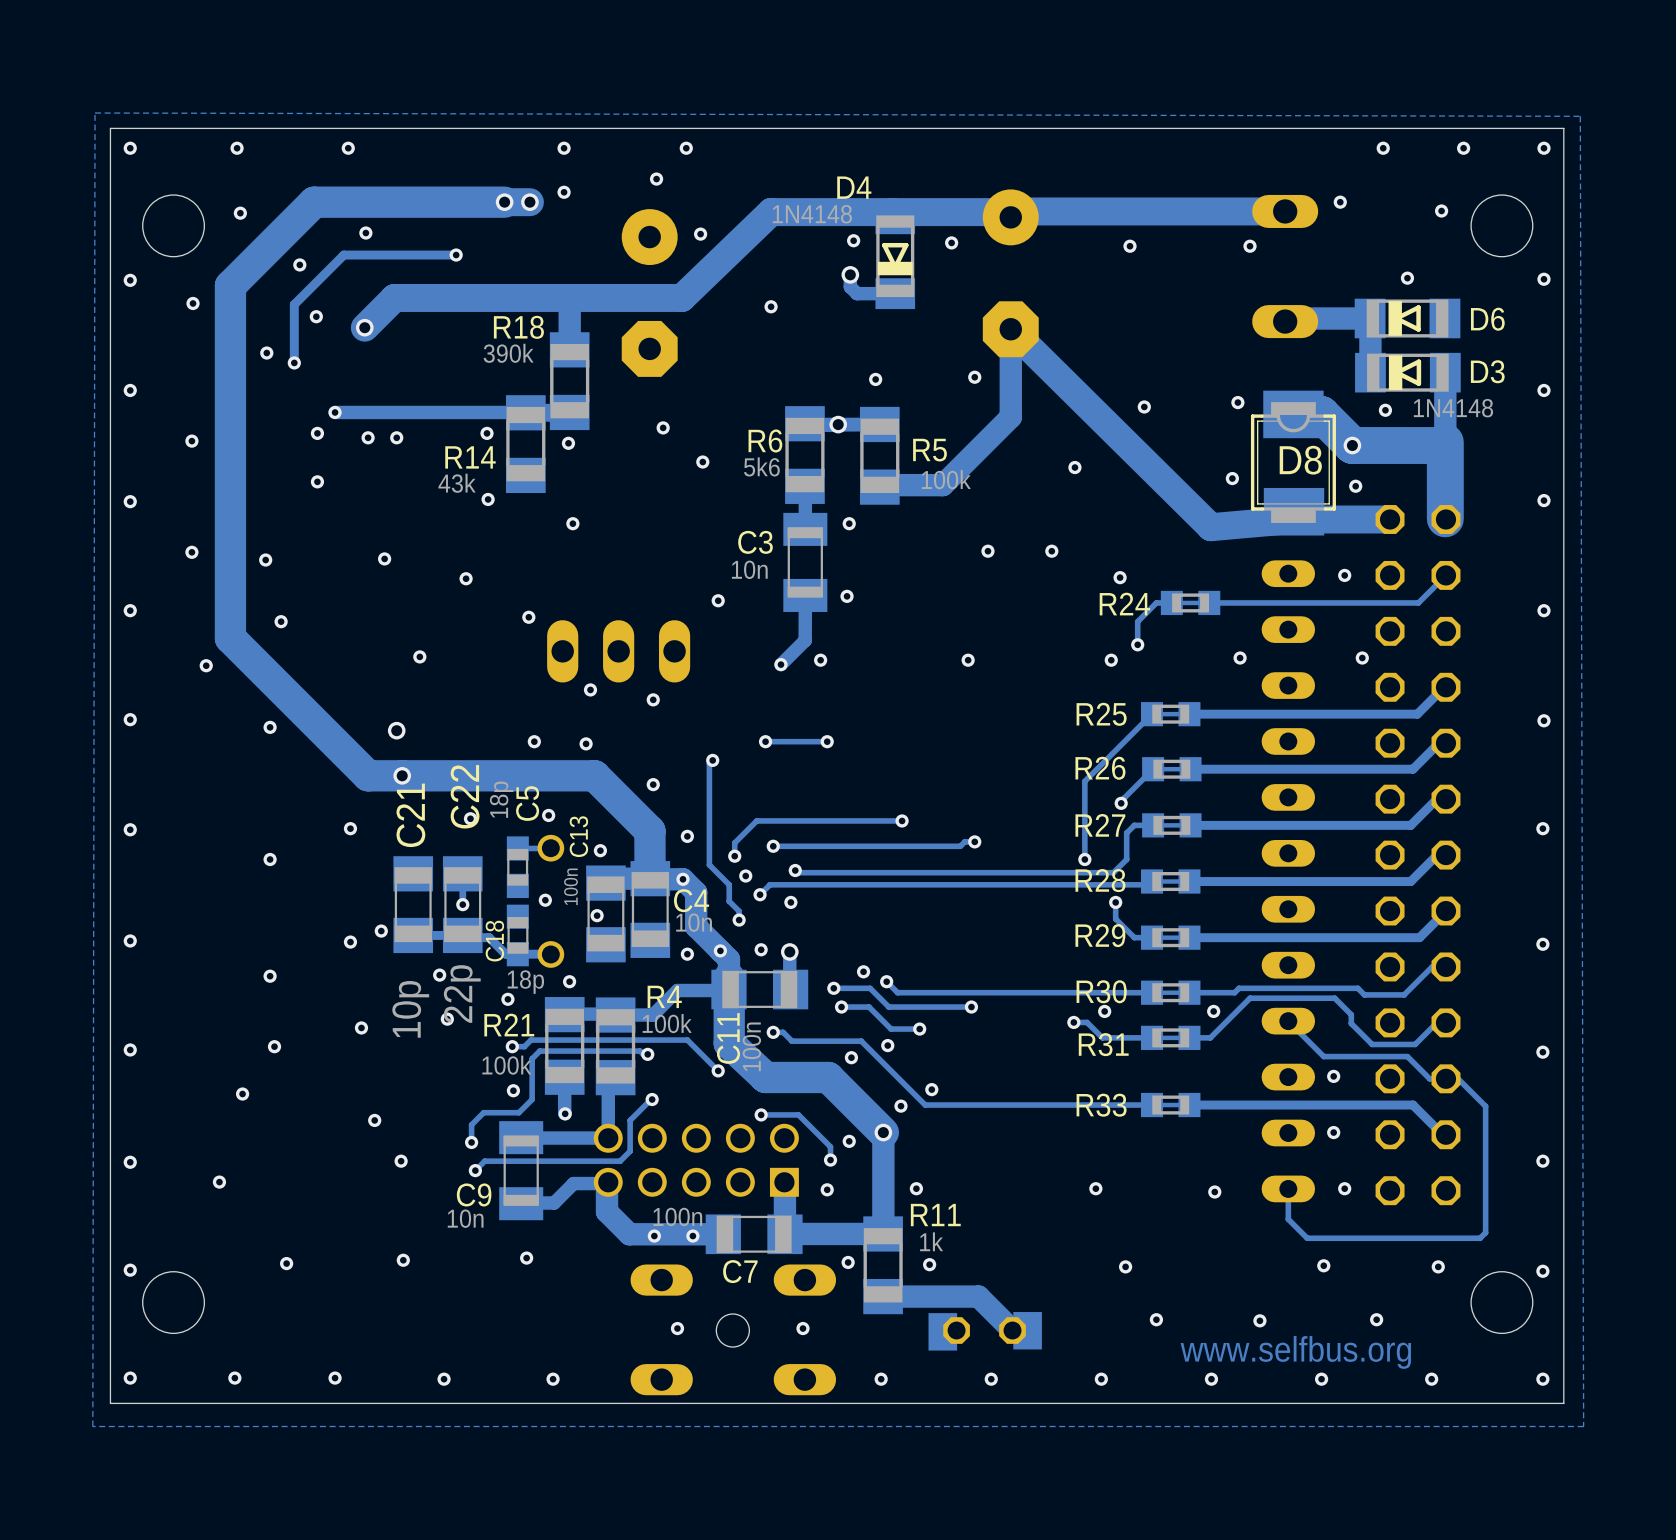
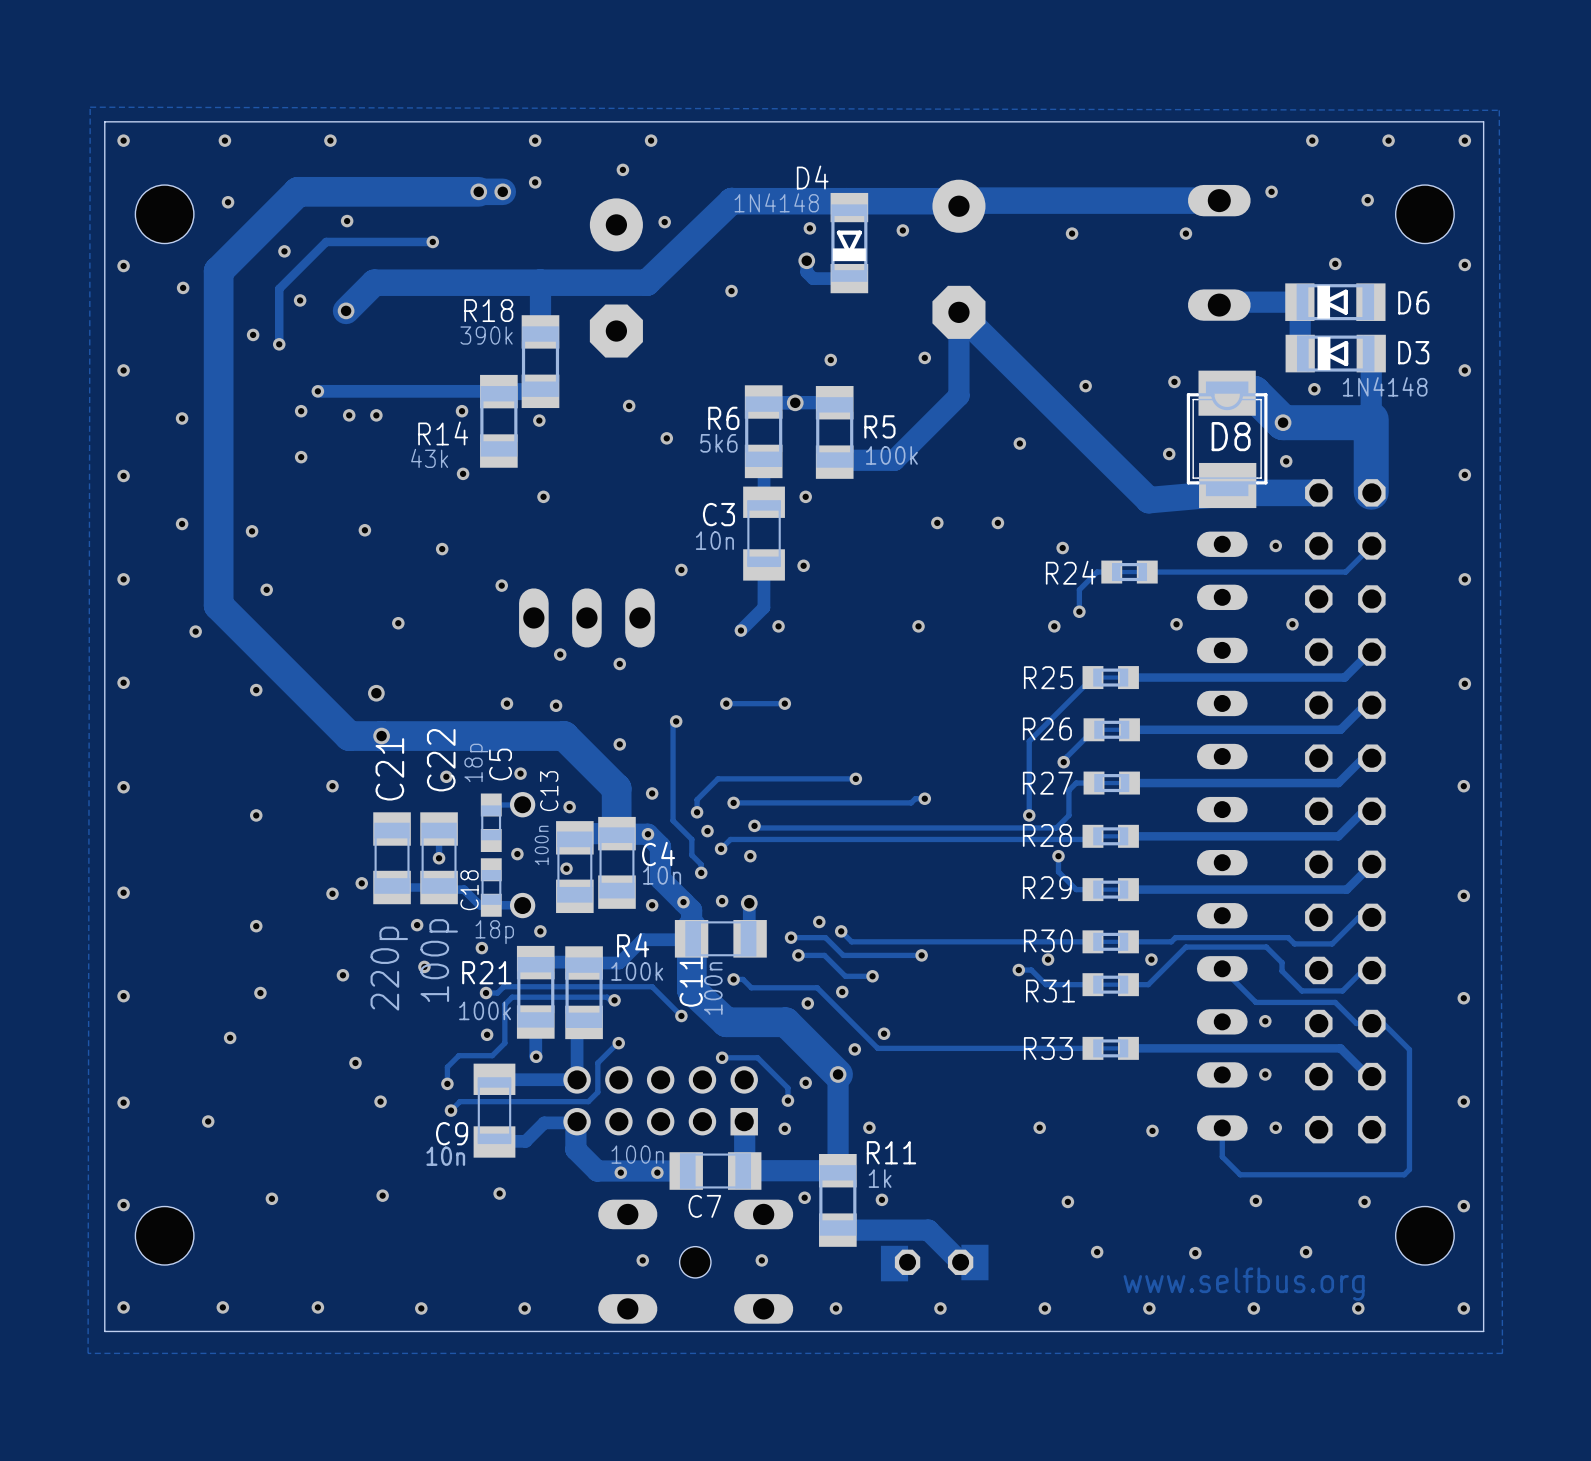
C22 value: 22p (462, 994) -> 100p (439, 960)
C21 value: 10p (410, 1009) -> 220p (389, 968)

